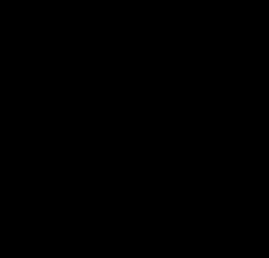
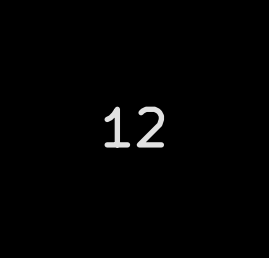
drawing: none -> [104, 106, 165, 148]

